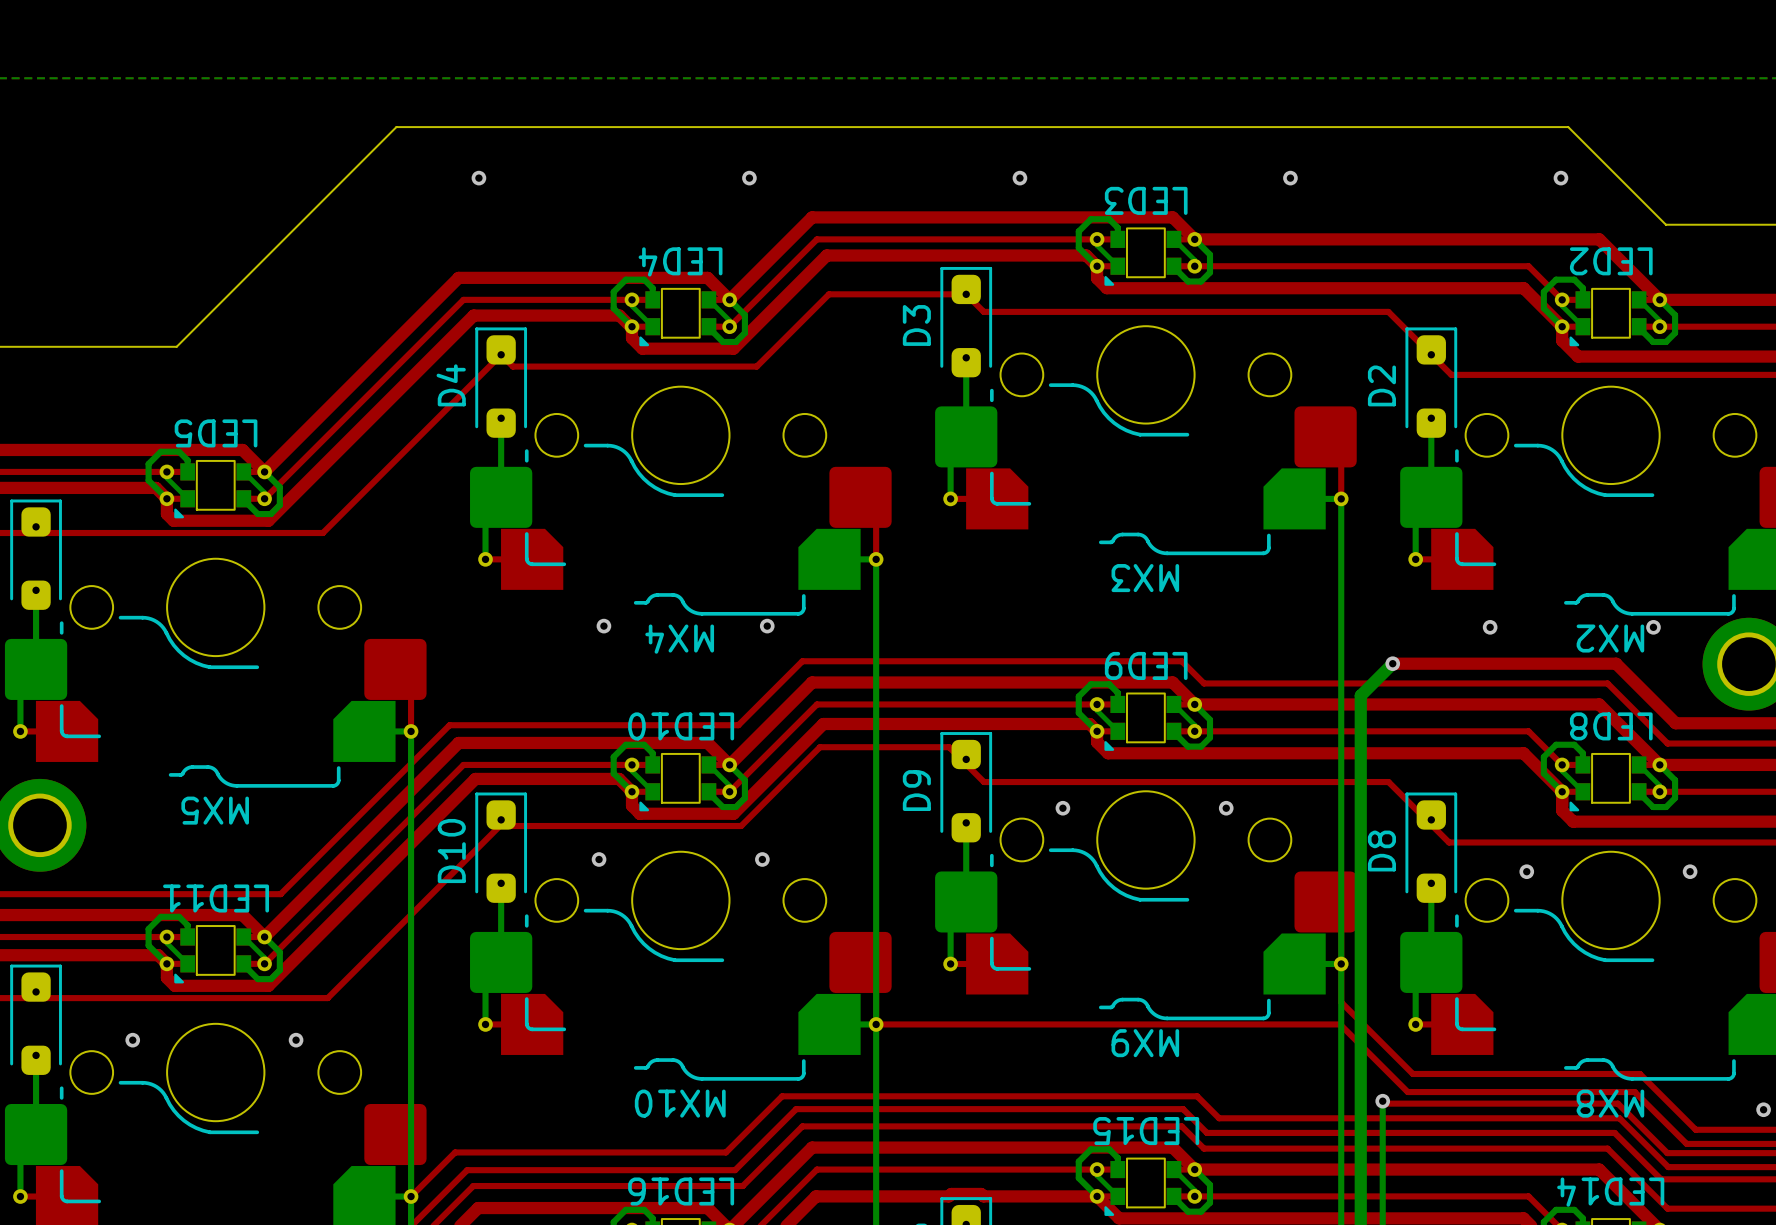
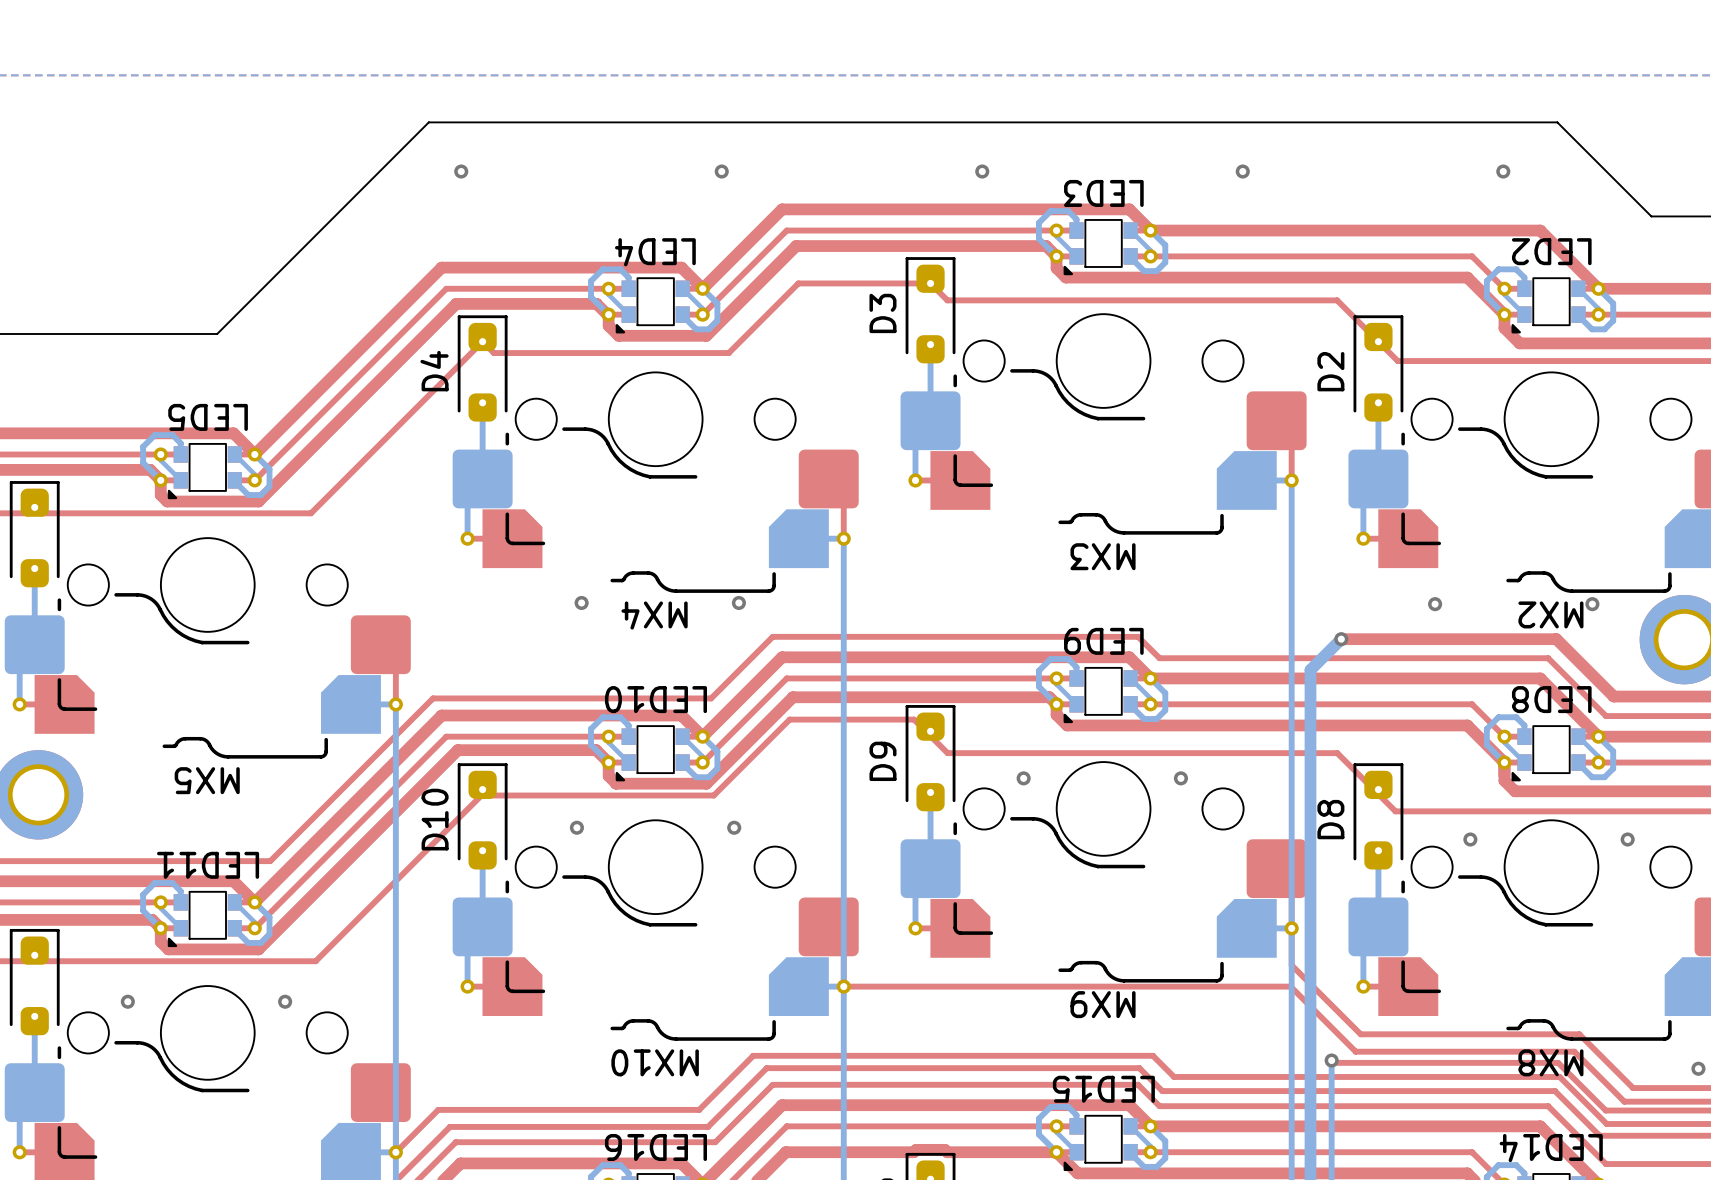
board edge: (445, 127) (396, 127) (176, 346) -> (428, 122) (217, 333) (170, 333)
board edge: (1568, 127) (1665, 224) (1714, 224) -> (1510, 122) (1557, 122) (1651, 216)

